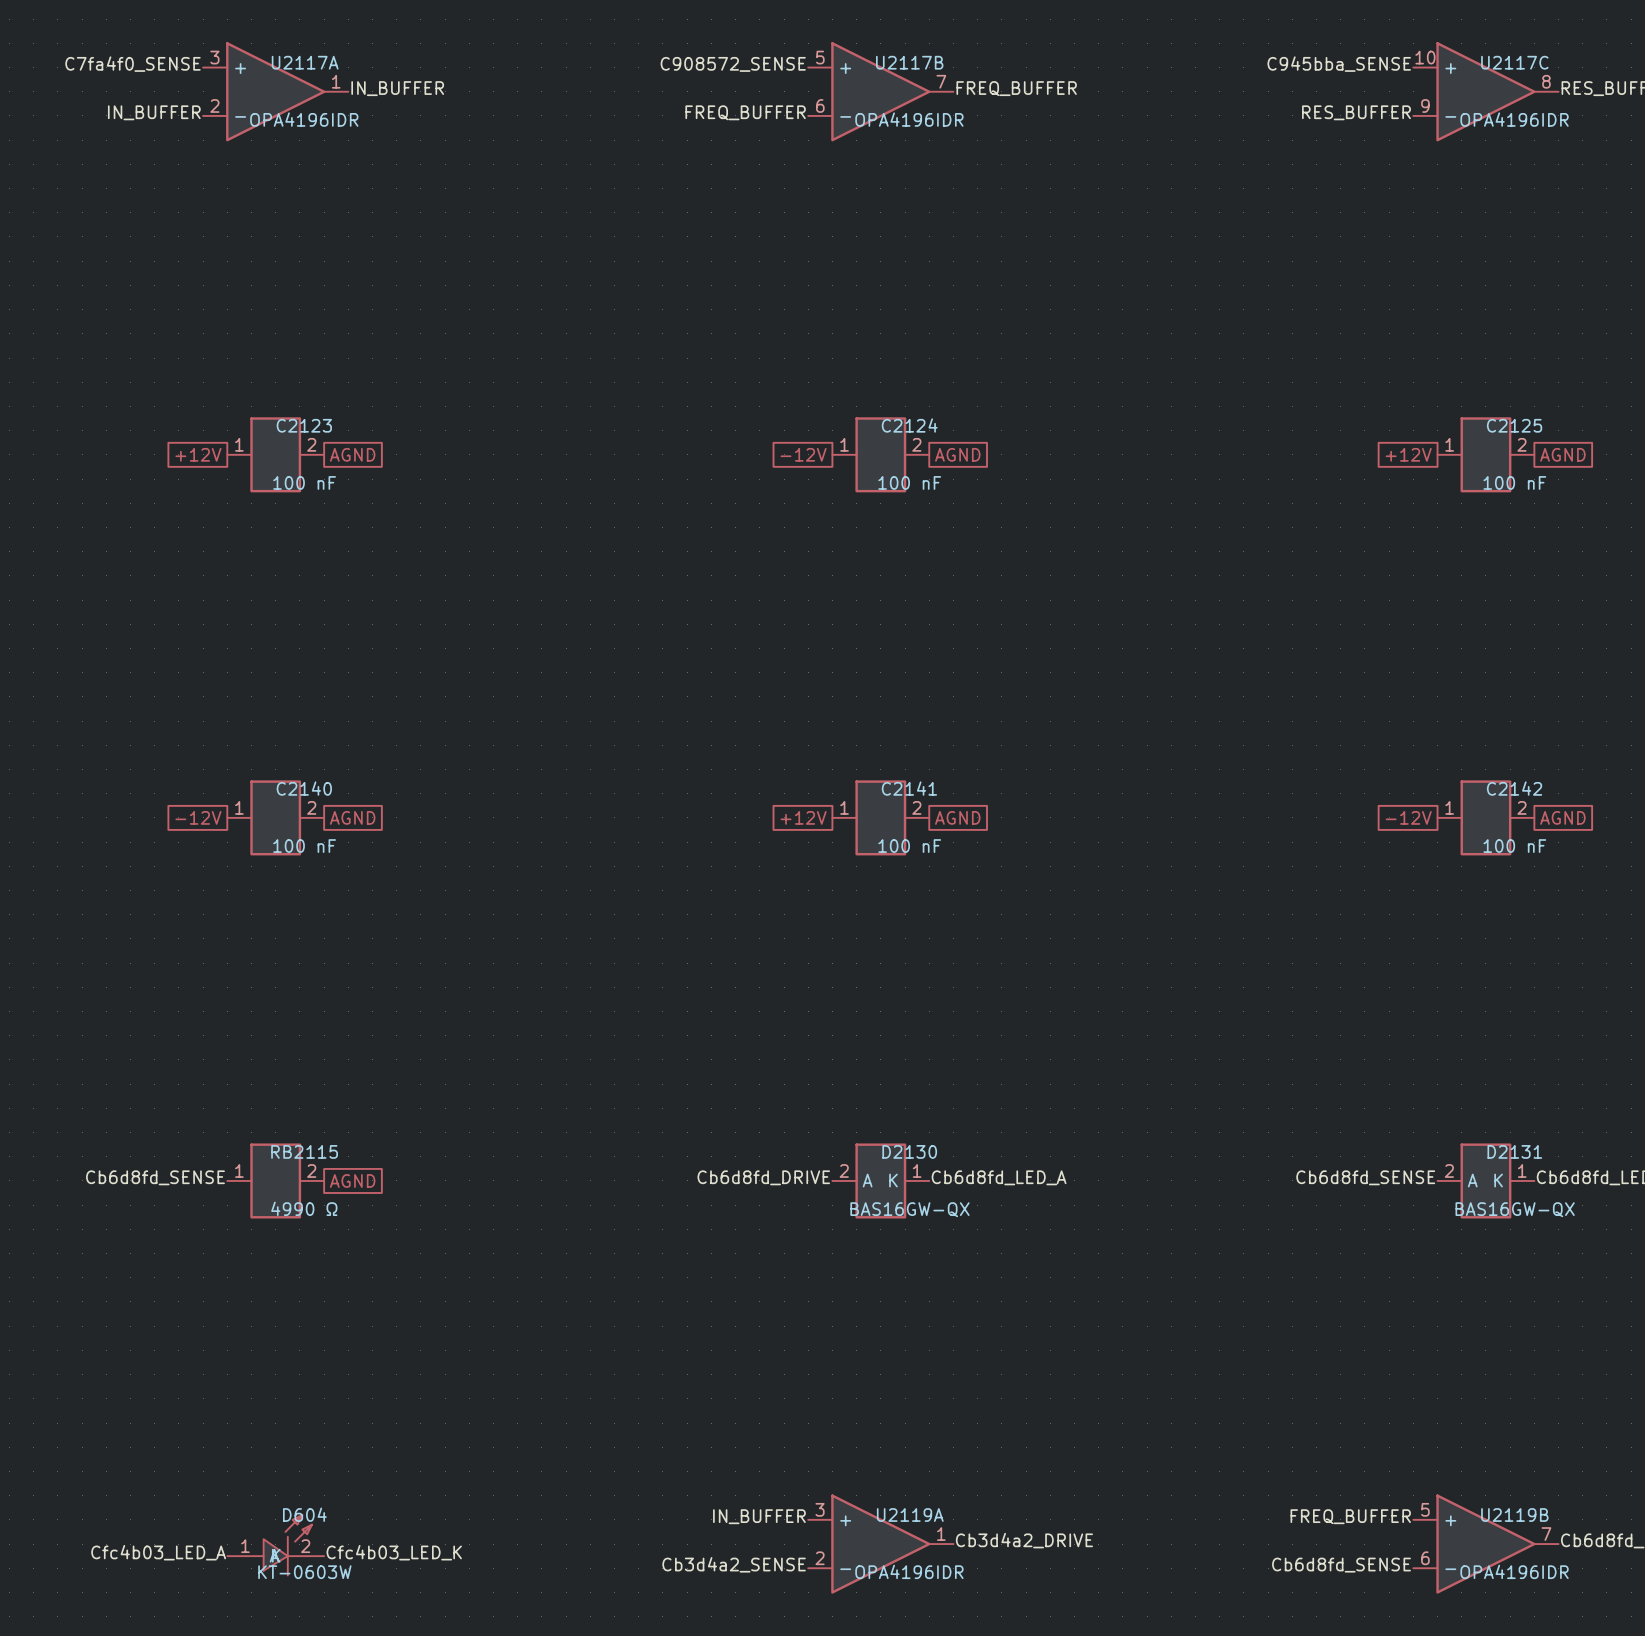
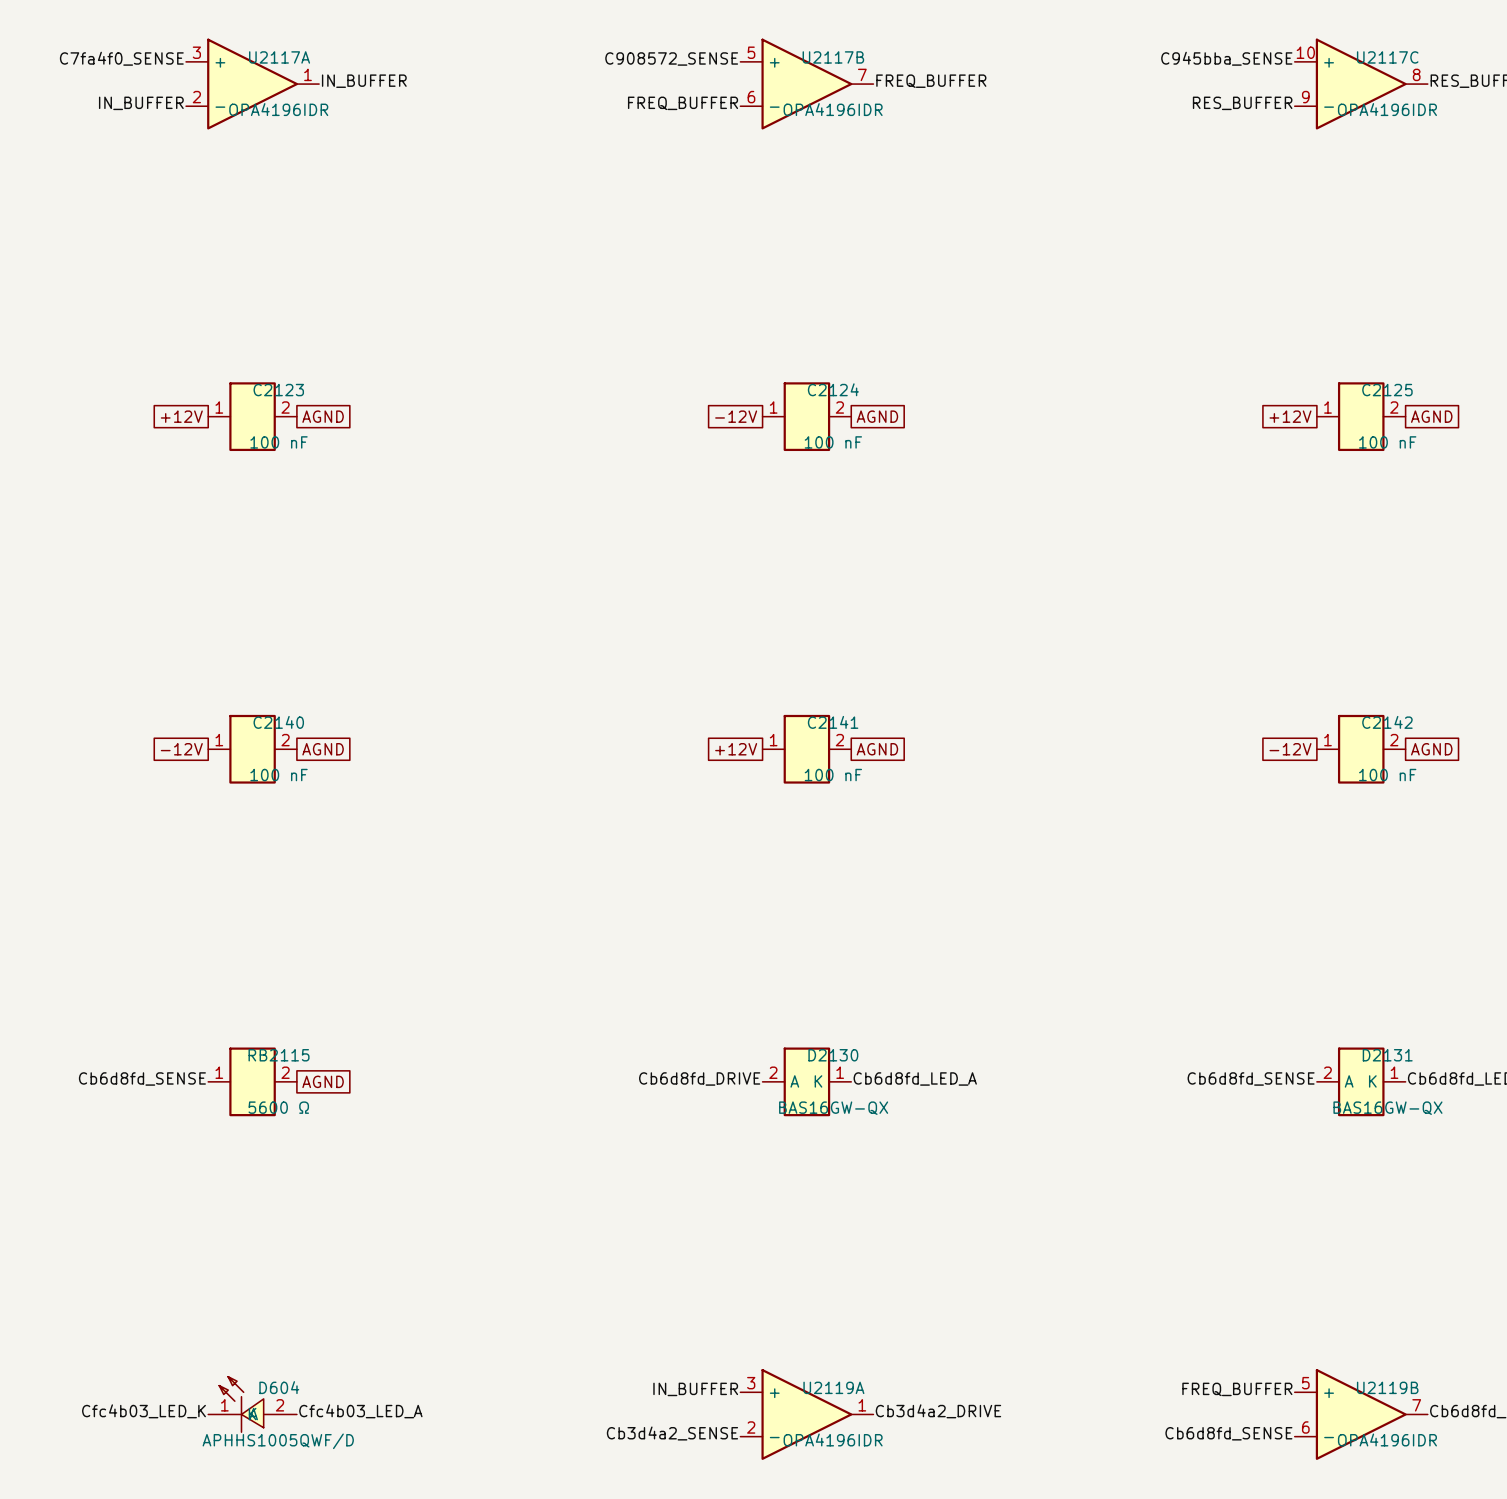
RB2115 value: 4990 Ω (304, 1208) -> 5600 Ω (278, 1107)
D604 symbol: [227, 1514, 325, 1576] -> [208, 1376, 297, 1433]
label position: Cfc4b03_LED_A (158, 1552) -> Cfc4b03_LED_A (360, 1411)
label position: Cfc4b03_LED_K (394, 1552) -> Cfc4b03_LED_K (143, 1411)
D604 value: KT-0603W (304, 1572) -> APHHS1005QWF/D (278, 1441)

